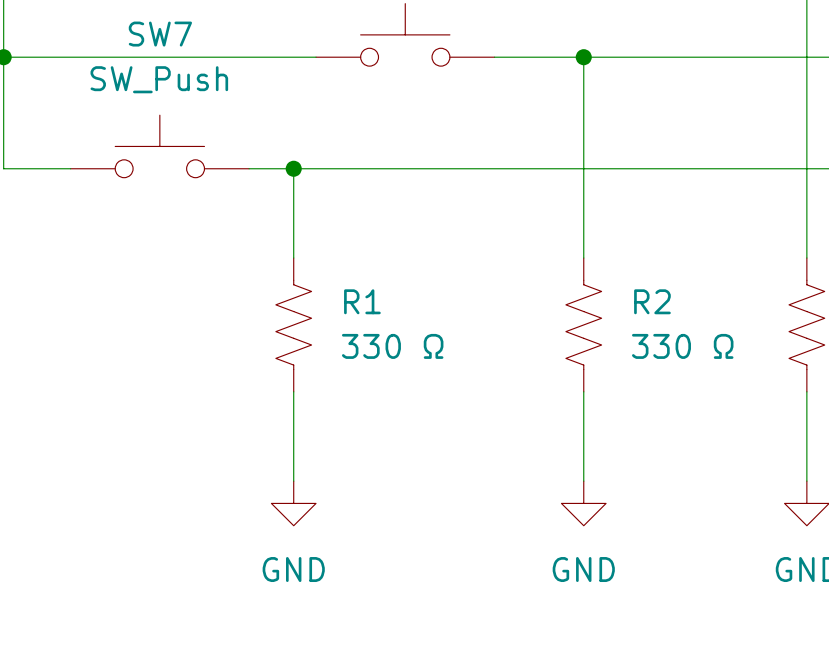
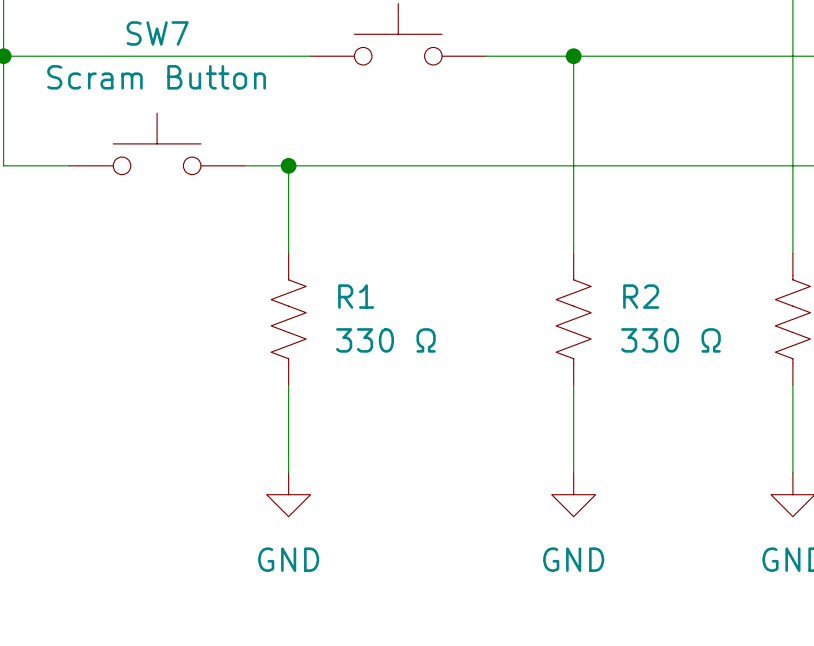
SW7 value: SW_Push (159, 79) -> Scram Button (156, 77)

